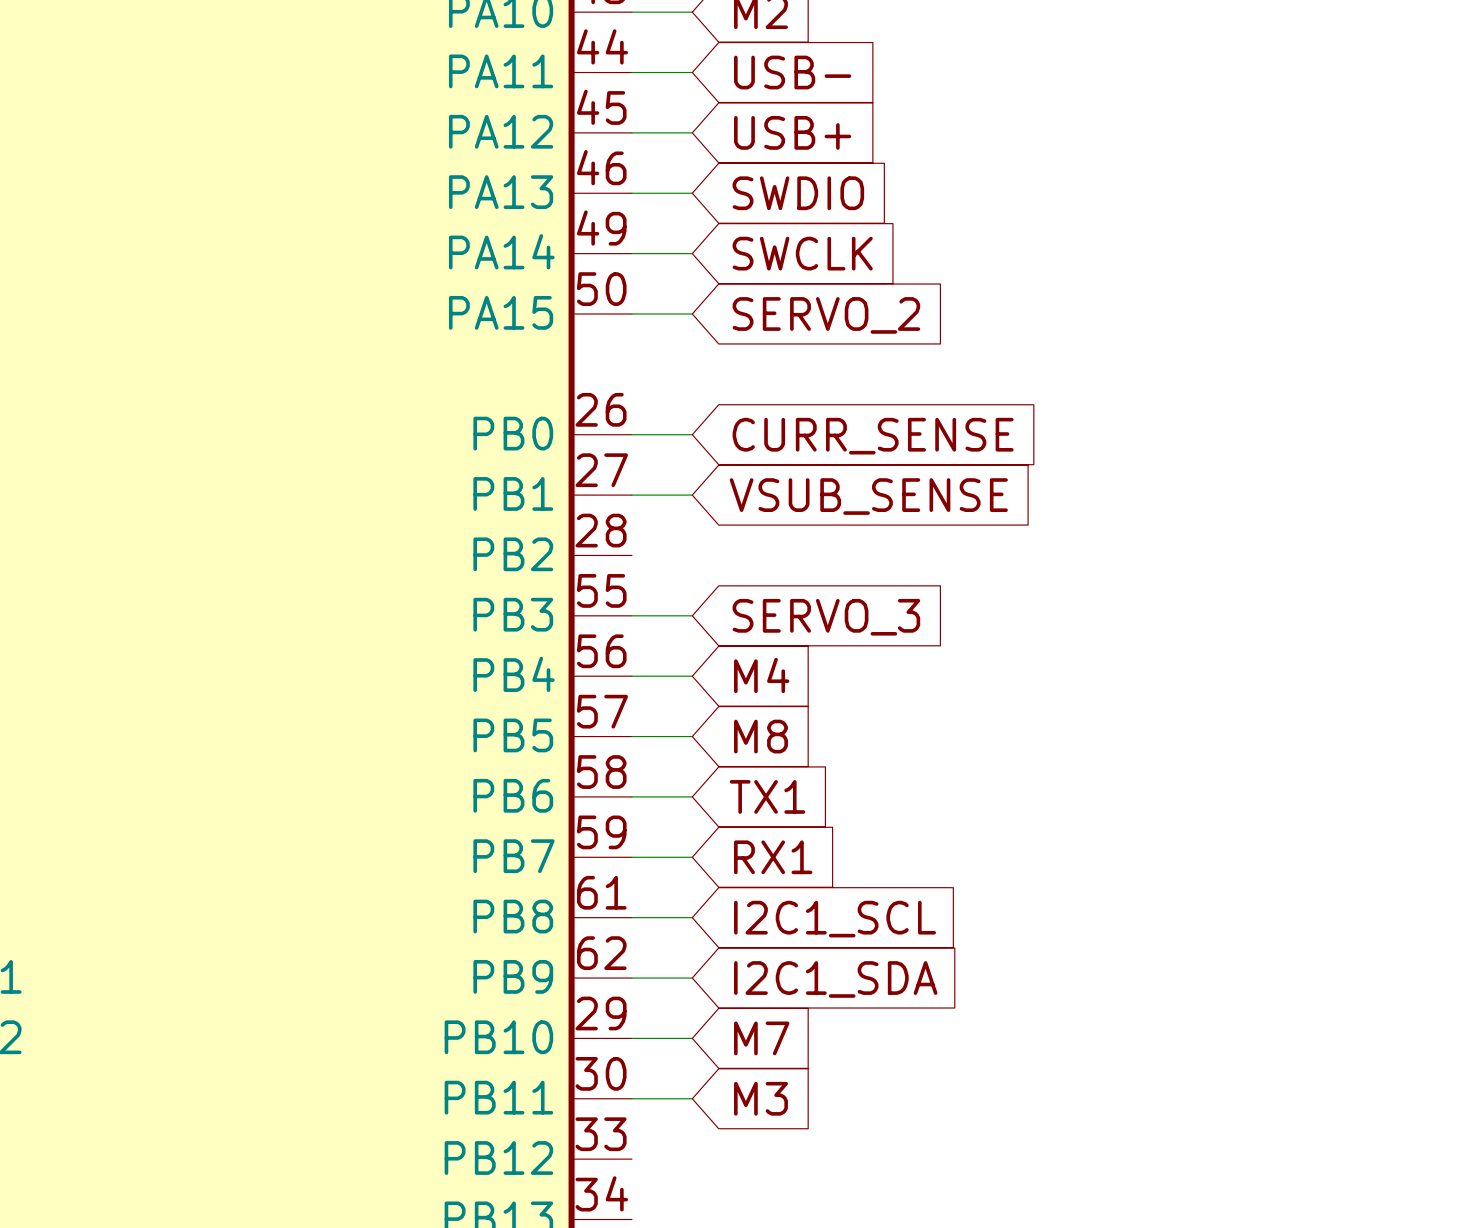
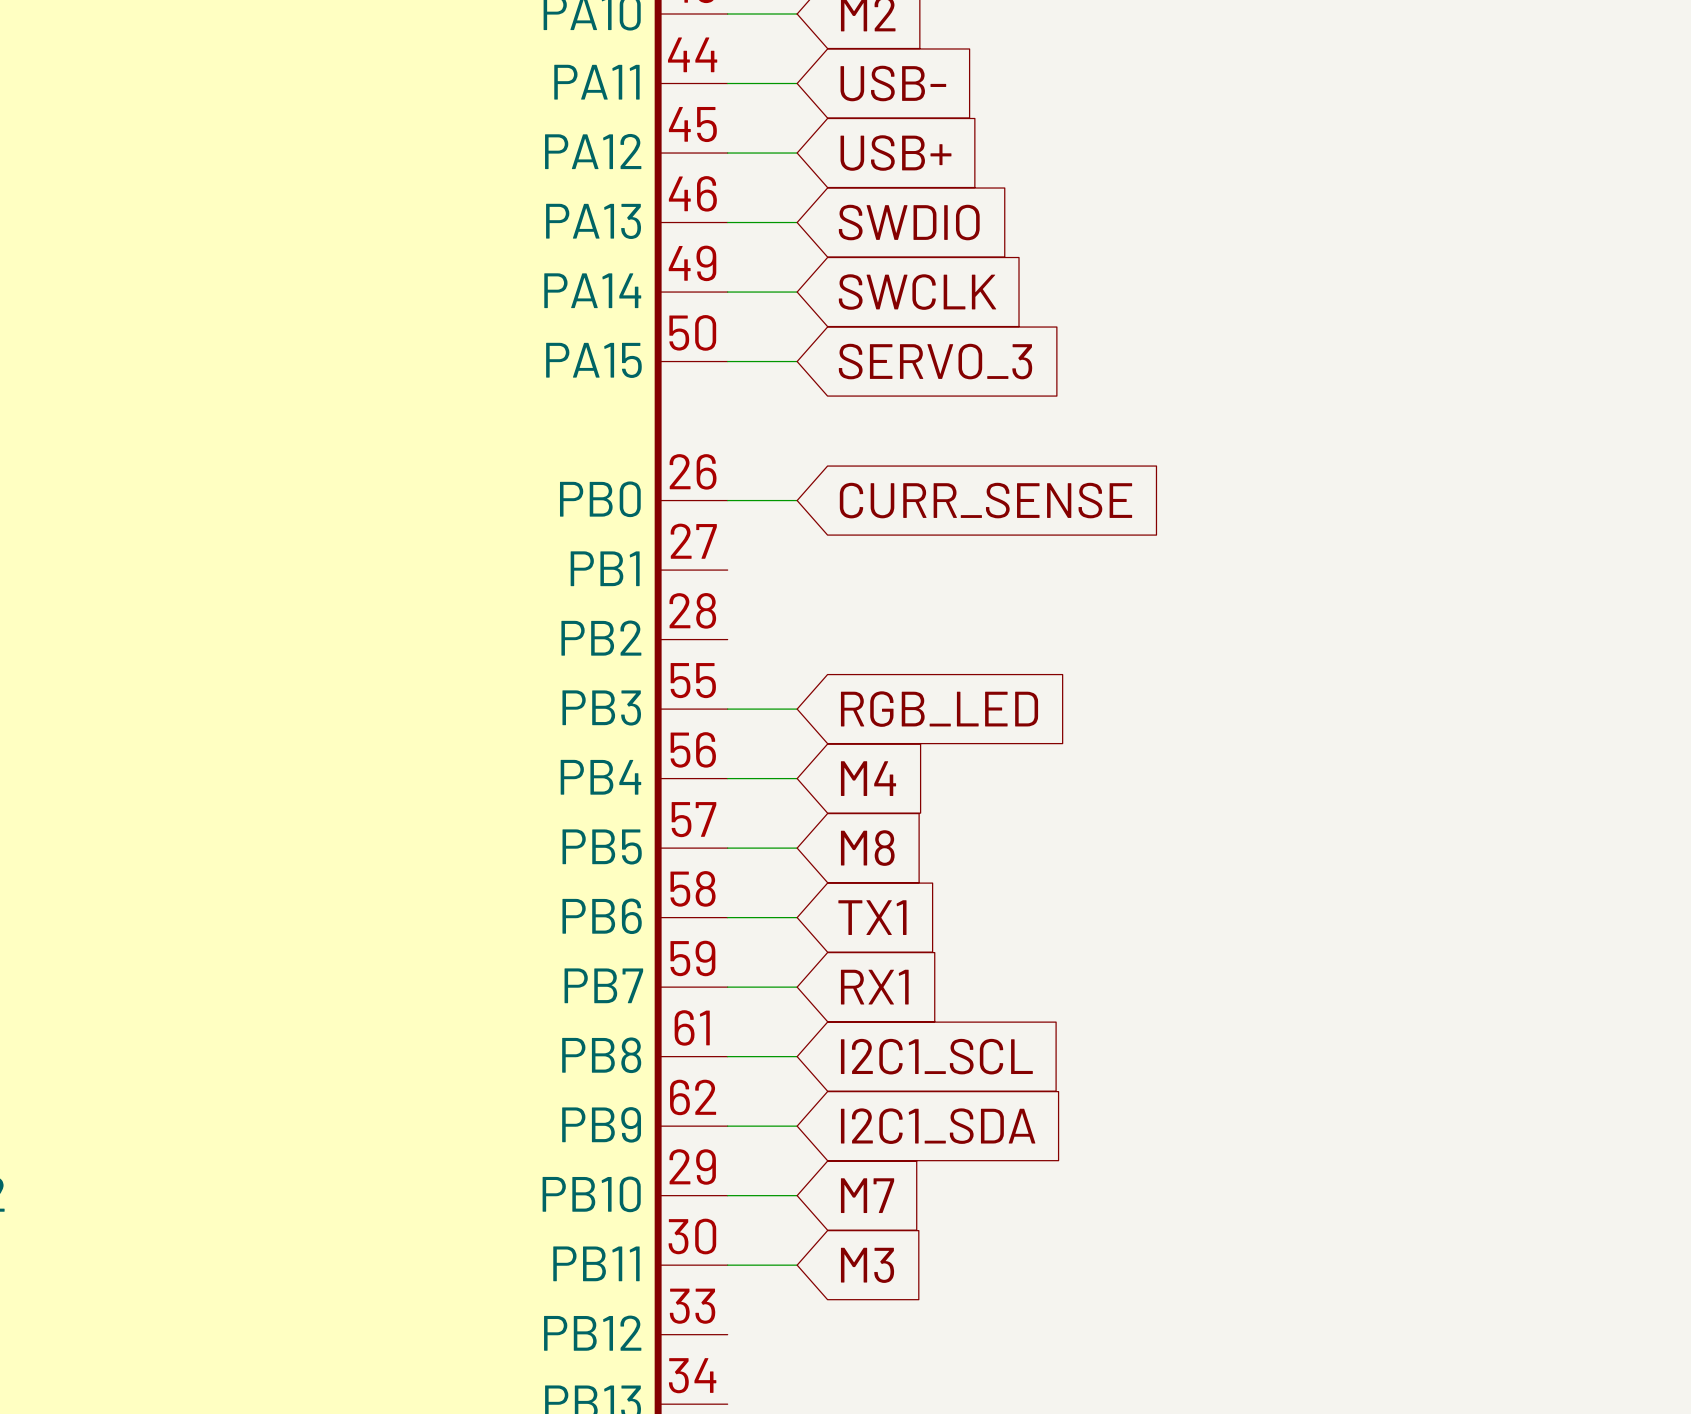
global label: SERVO_2 (826, 315) -> SERVO_3 (935, 361)
wire: (631, 495) (692, 495) -> none
global label: VSUB_SENSE (868, 496) -> none
global label: SERVO_3 (826, 617) -> RGB_LED (939, 709)

